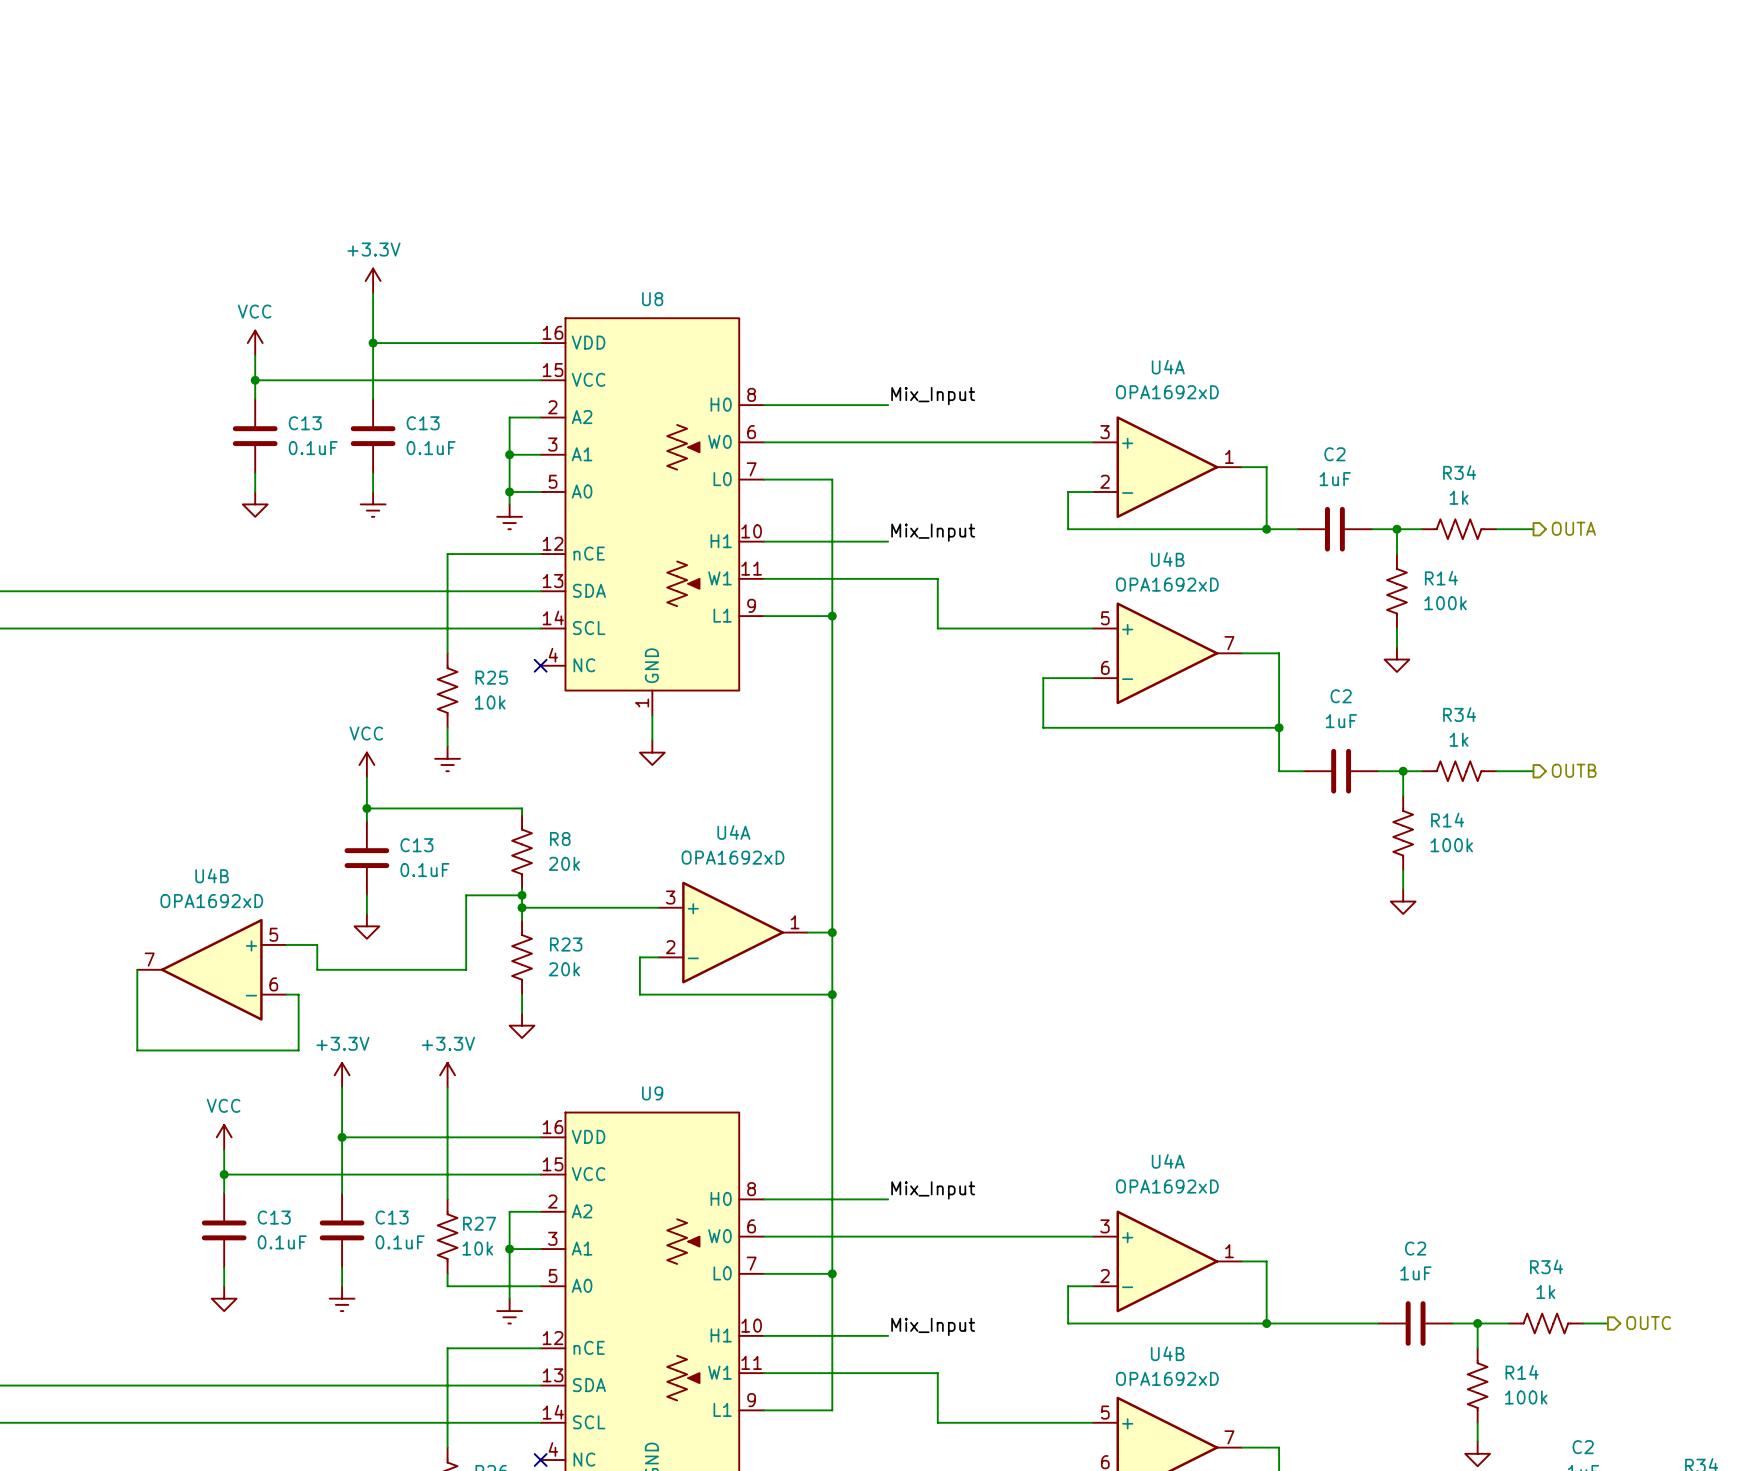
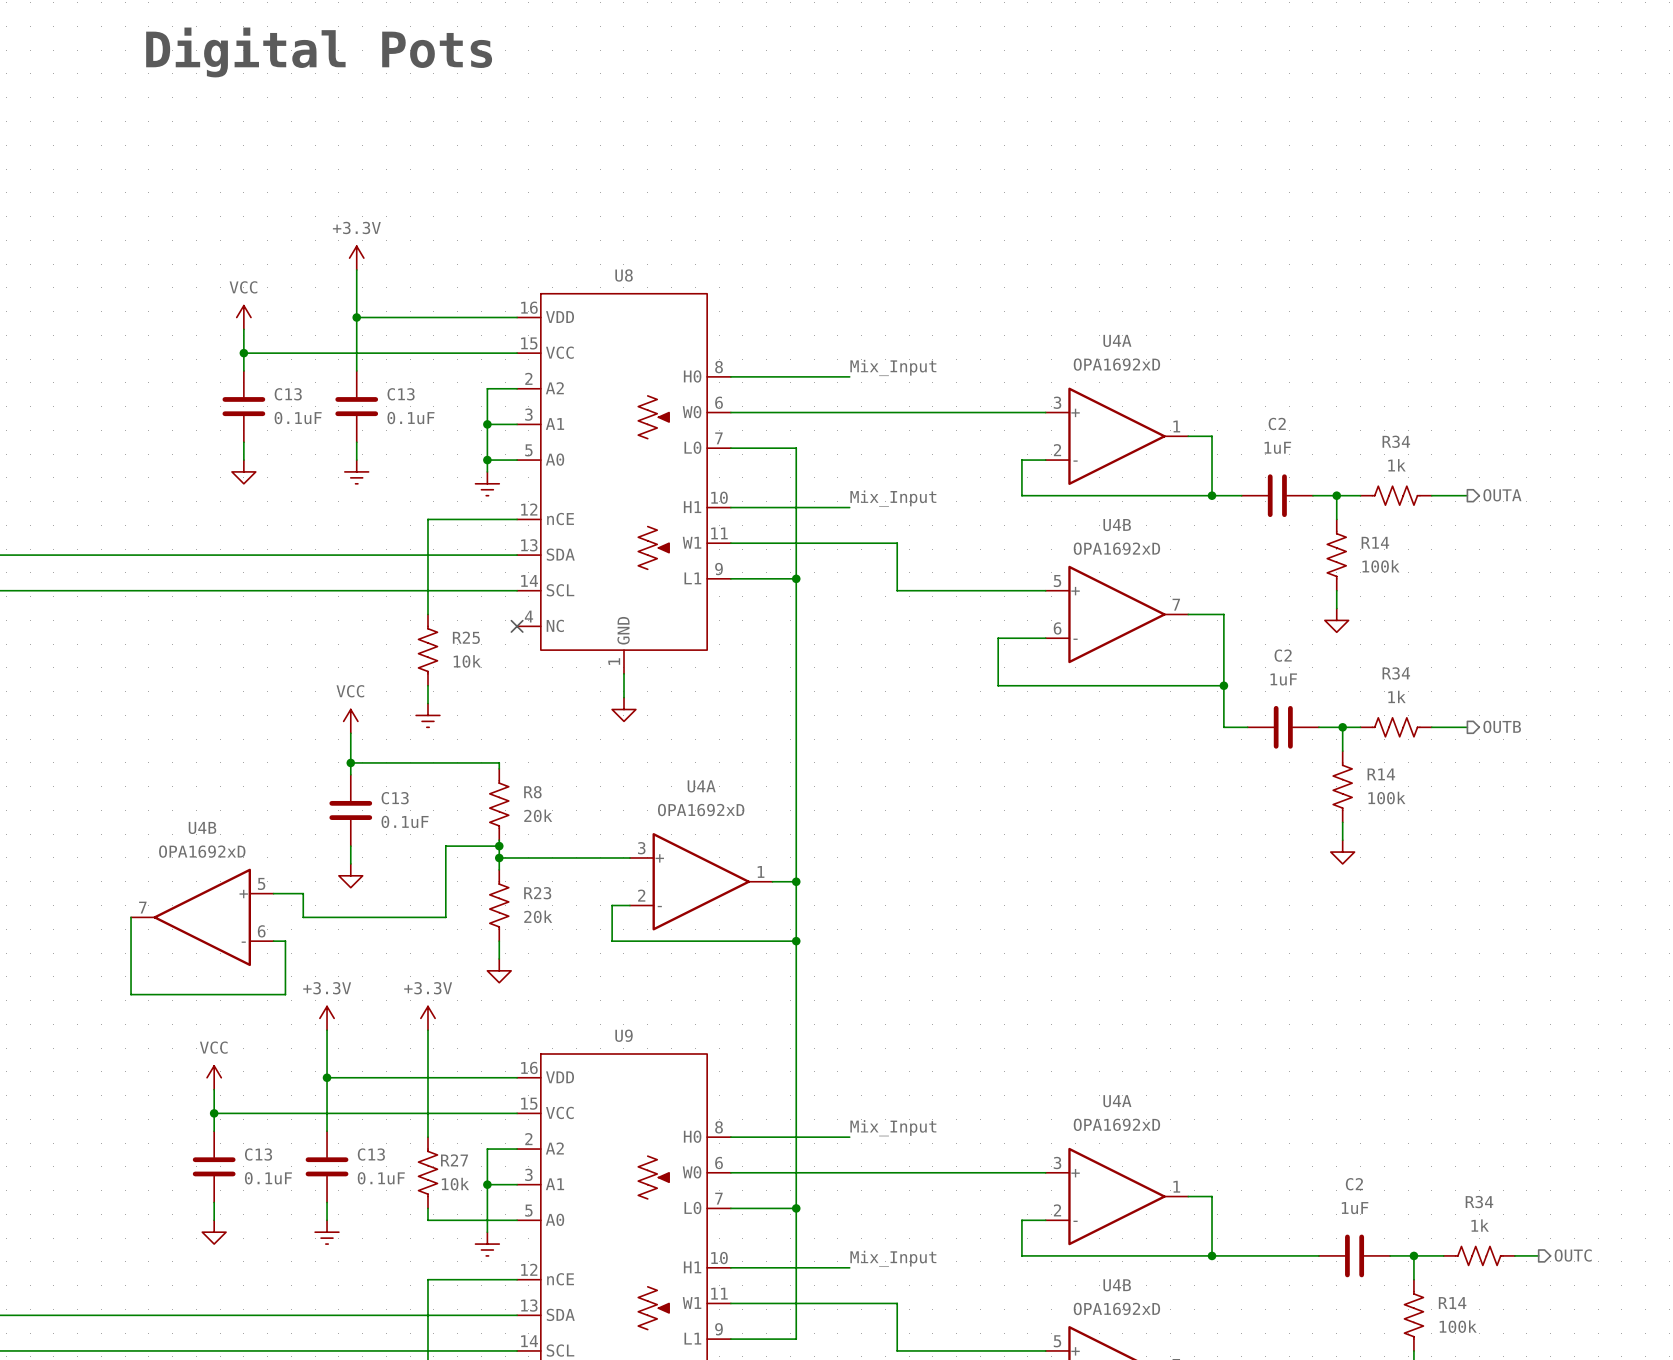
text: none -> Digital Pots (319, 52)

